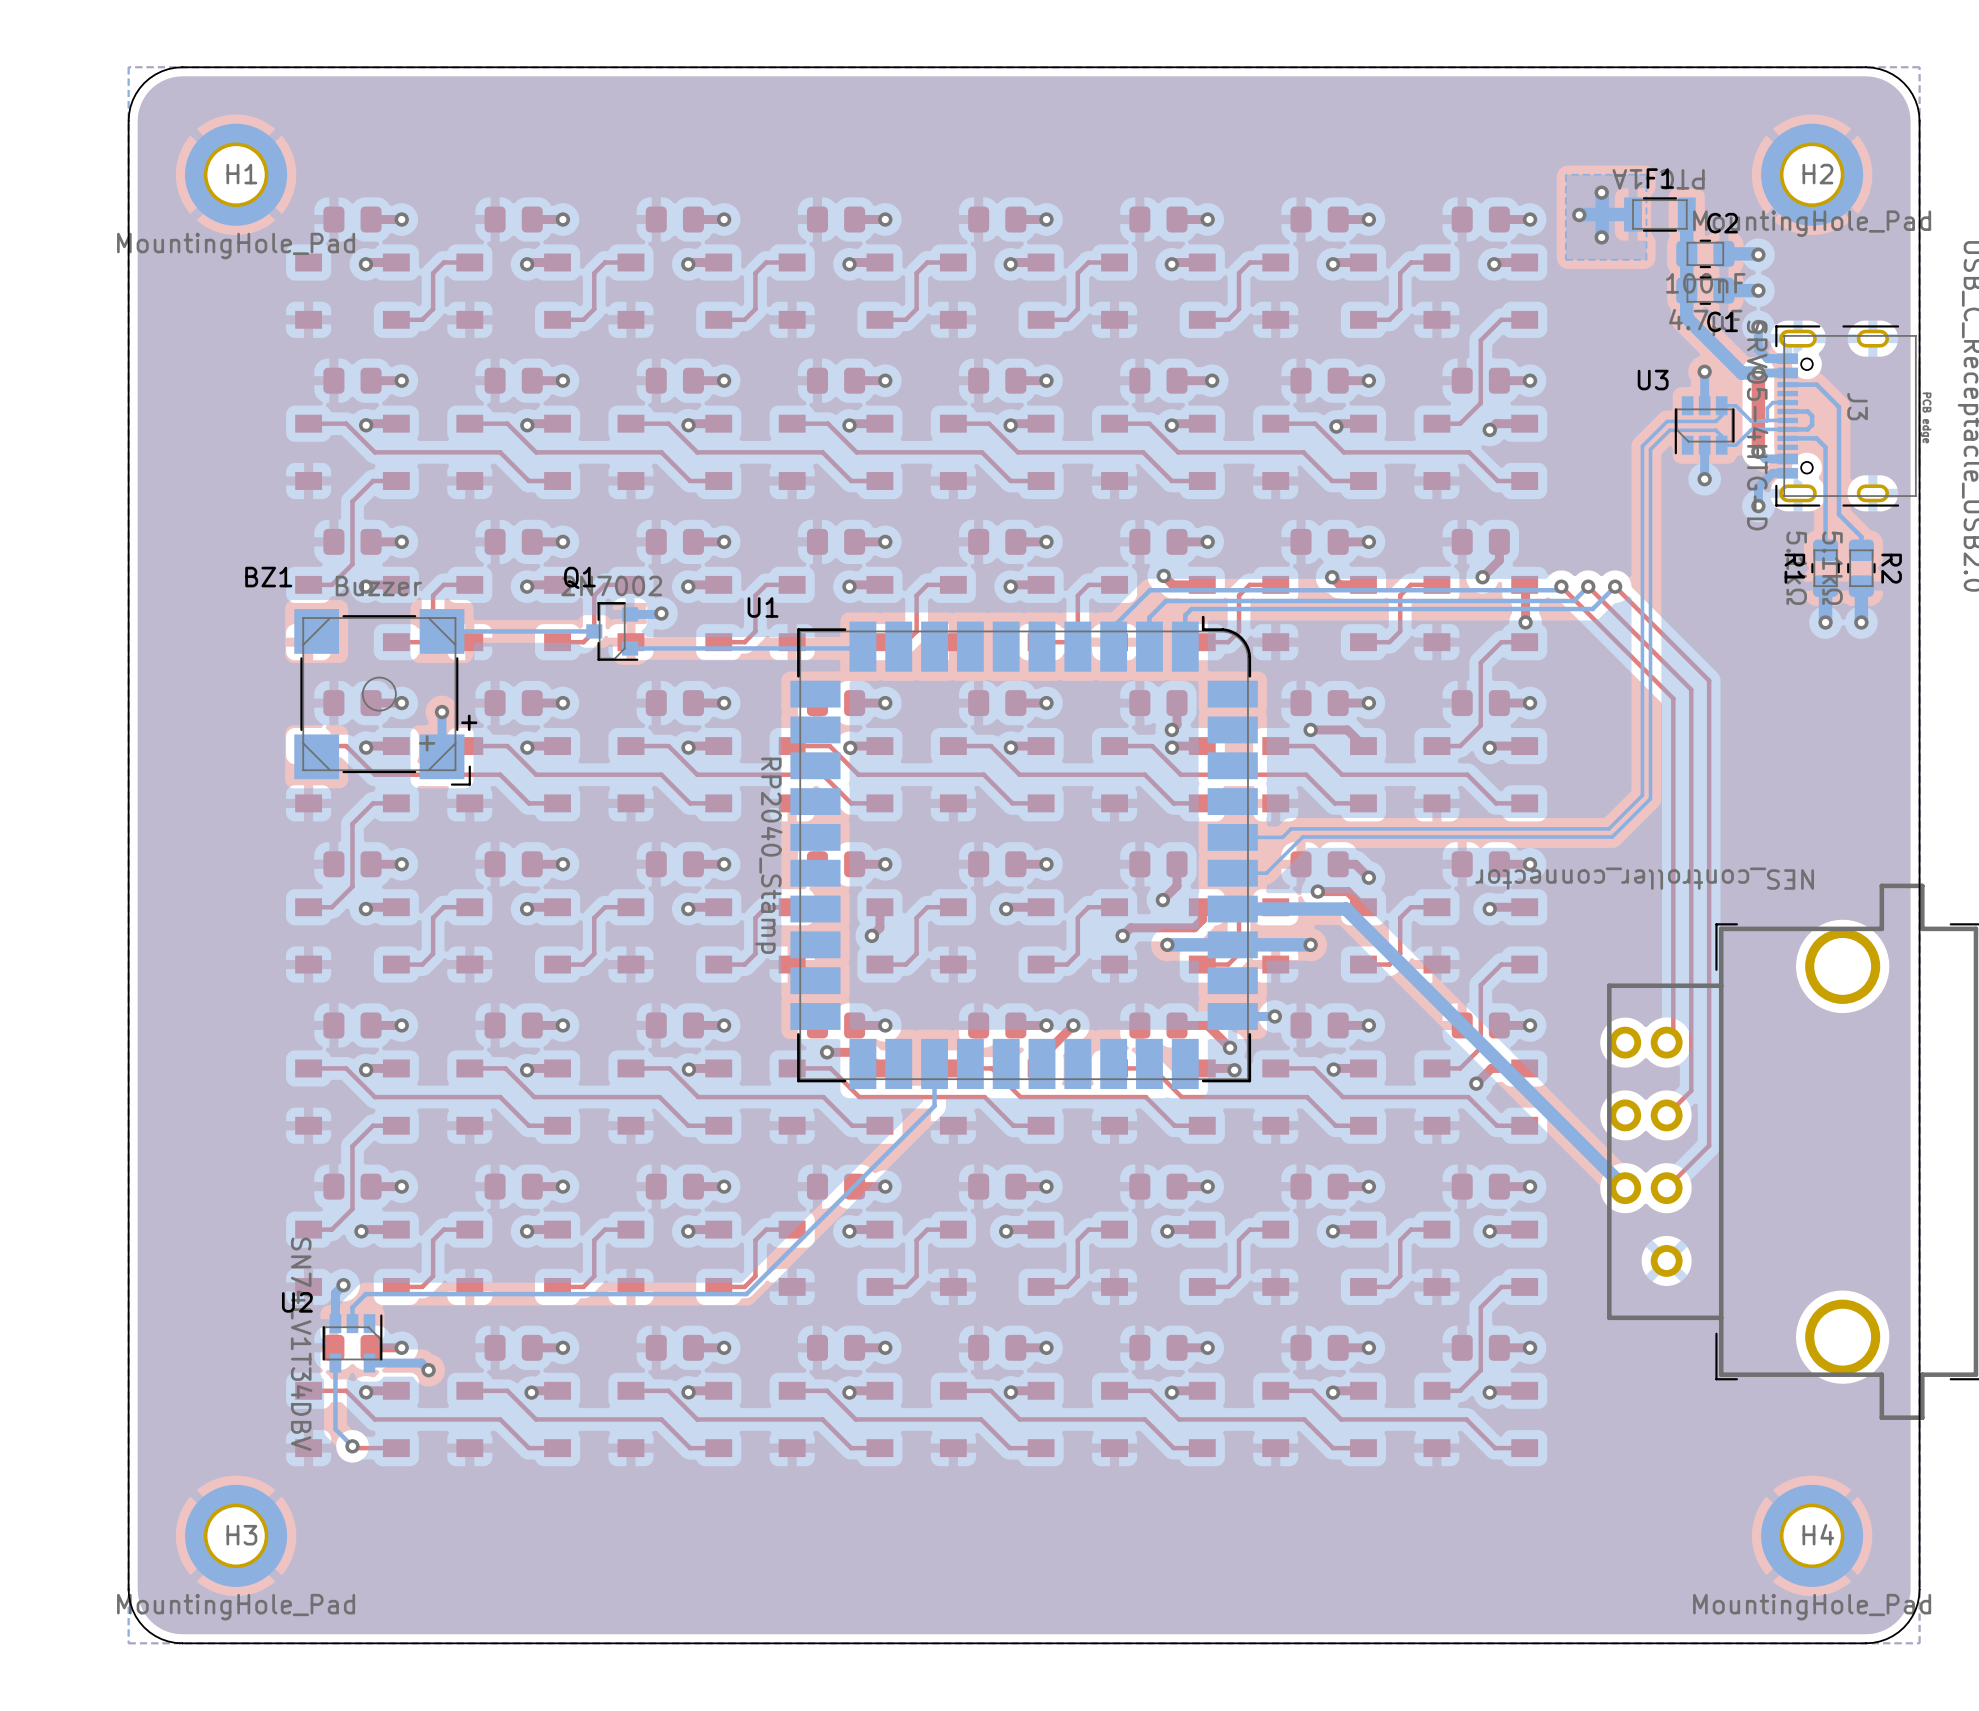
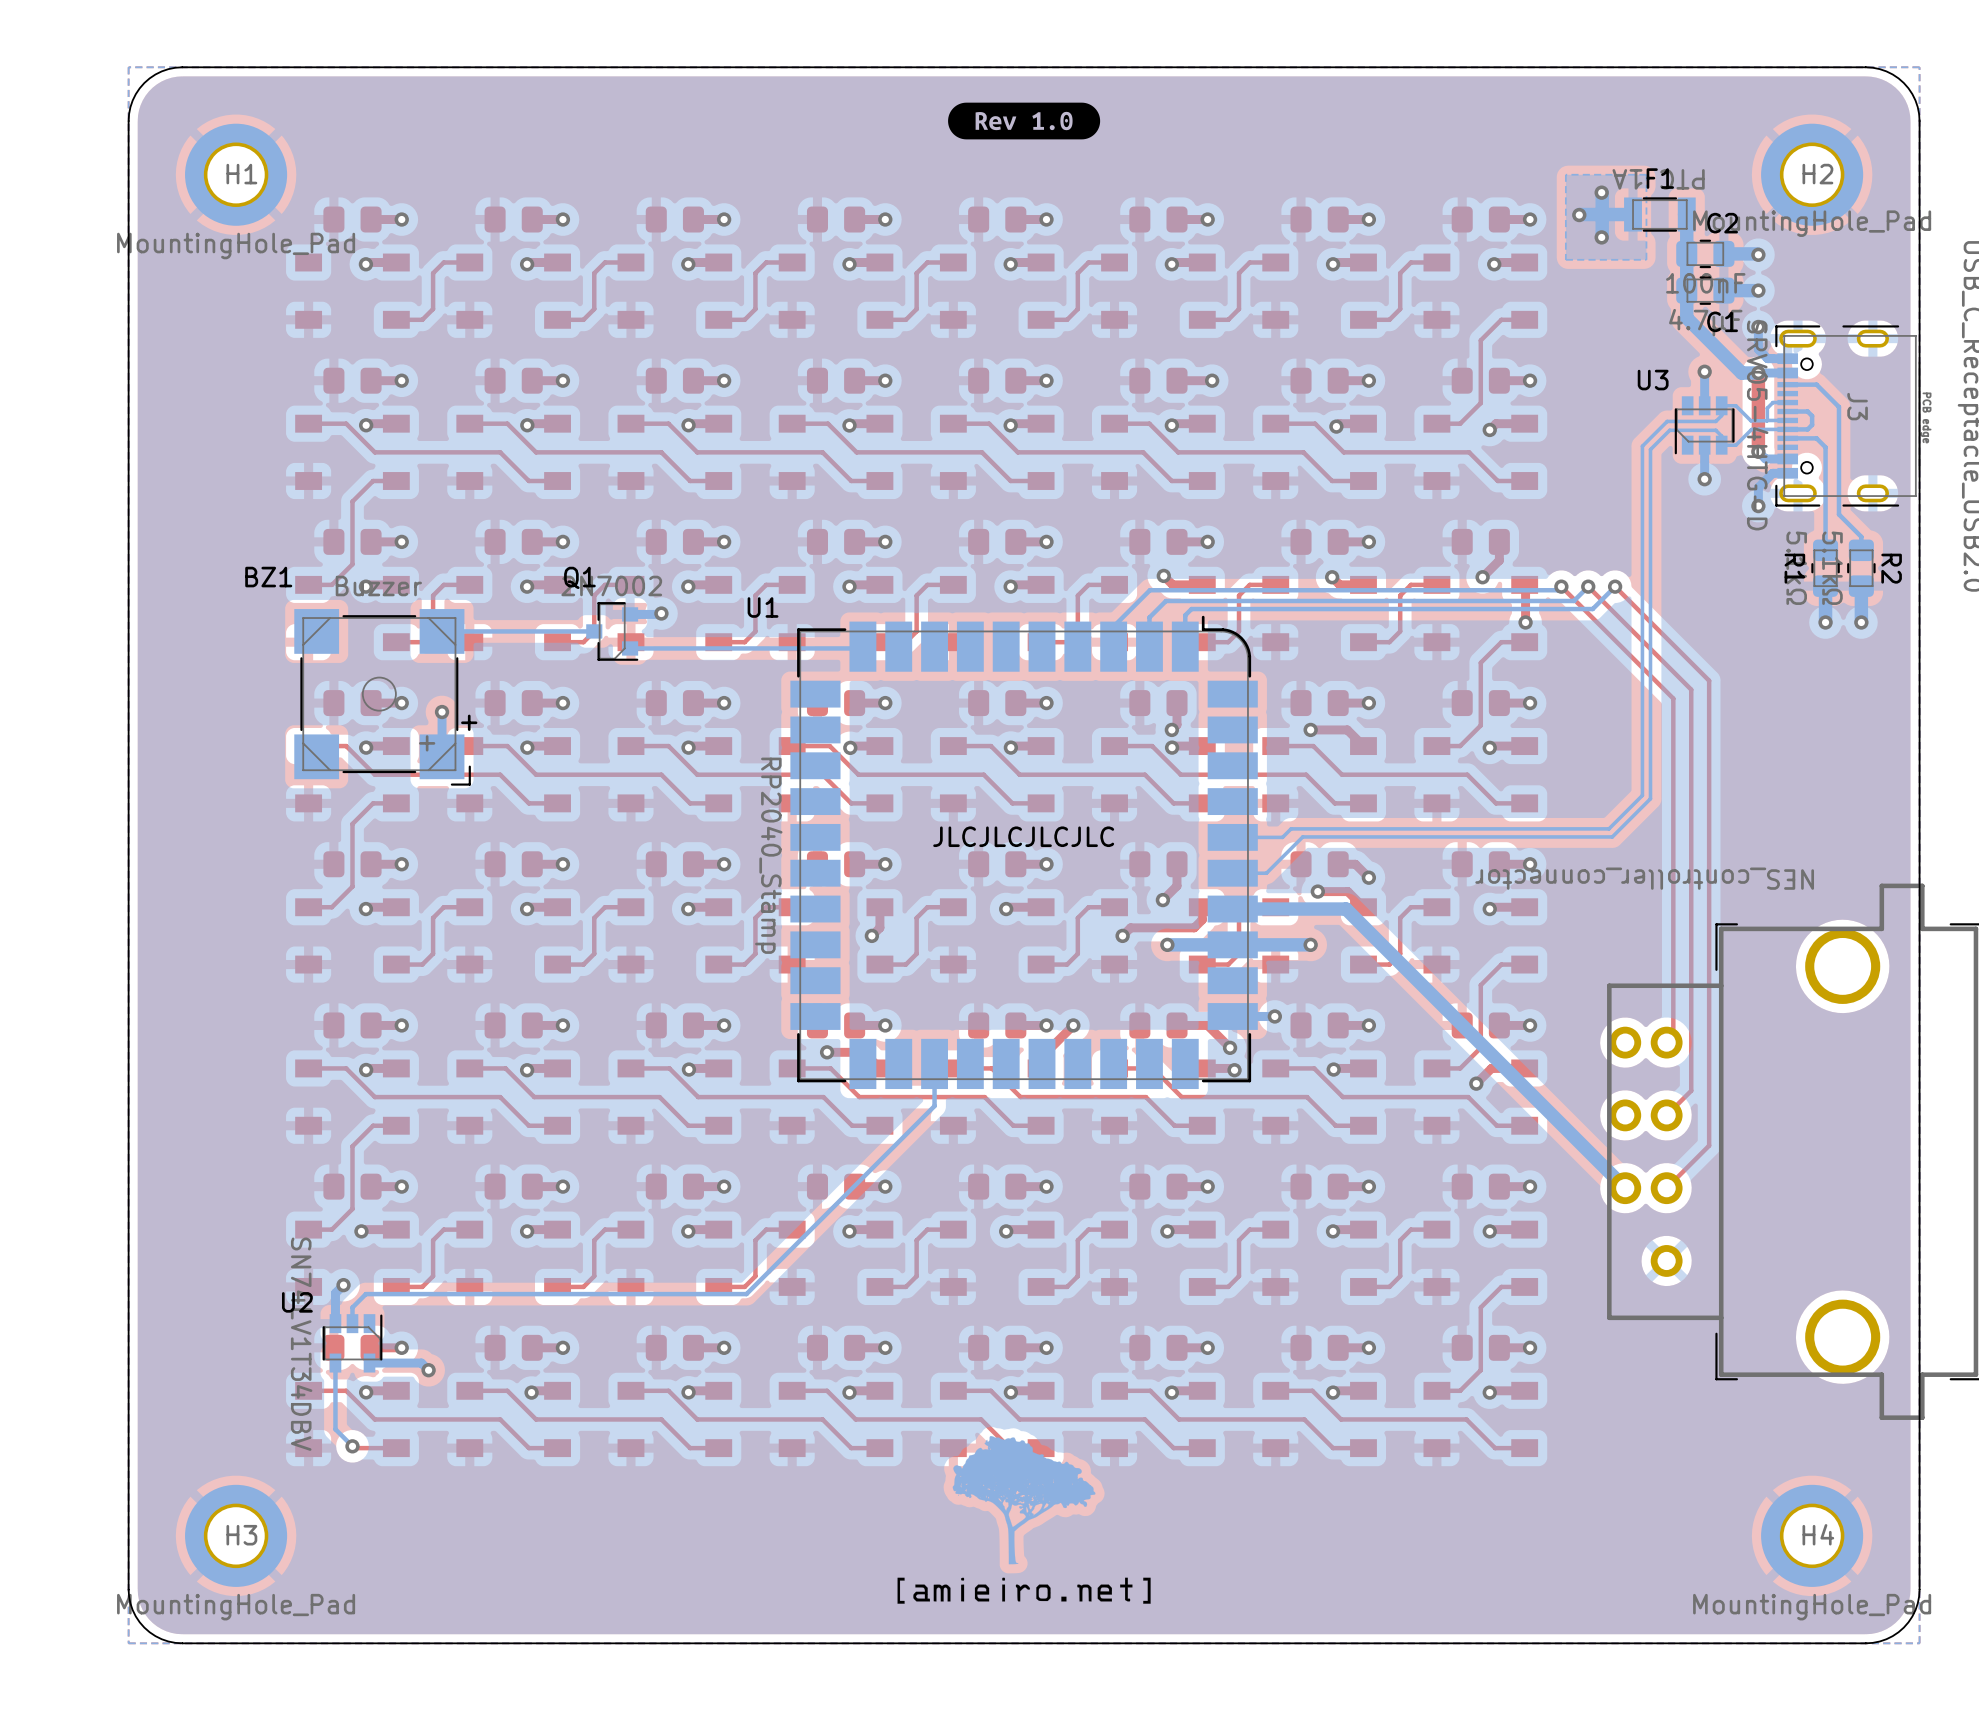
drawing: none -> [948, 102, 1101, 140]
text: none -> JLCJLCJLCJLC (1023, 836)
drawing: none -> [897, 1436, 1151, 1604]

